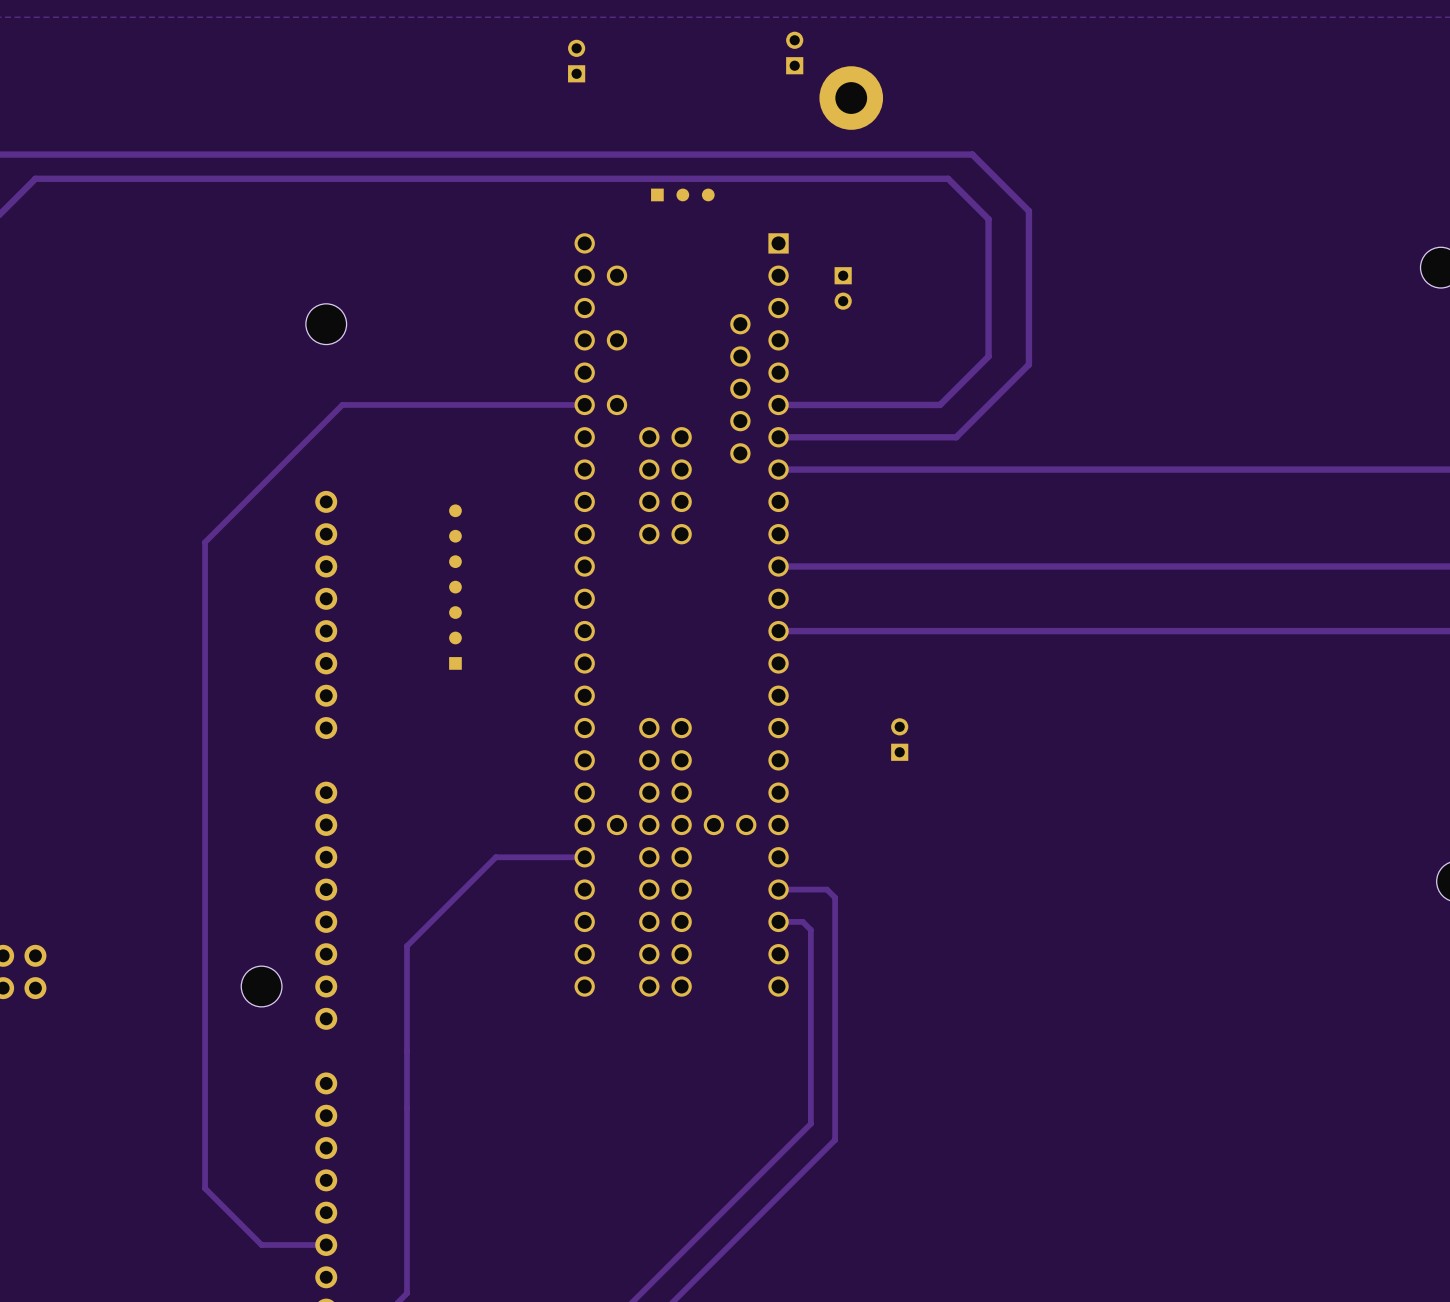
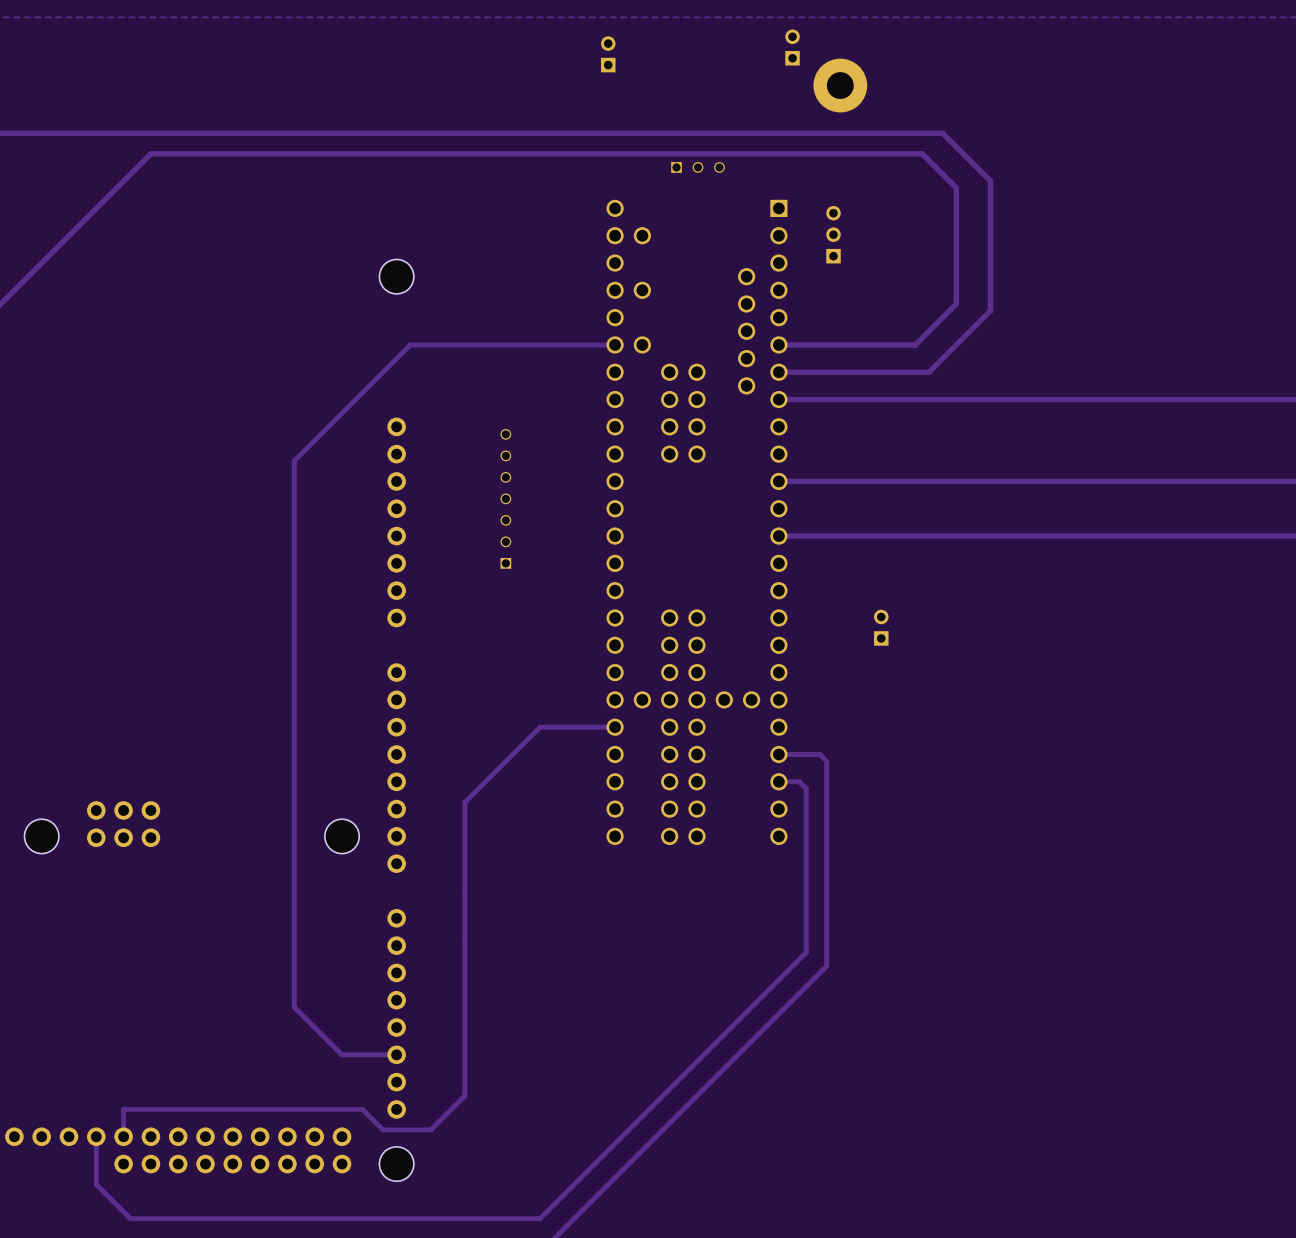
part footprint: [651, 188, 715, 202] -> [671, 162, 725, 173]
part: none -> (833, 234)
part: (843, 288) -> none
part footprint: [449, 504, 462, 670] -> [500, 429, 512, 569]

